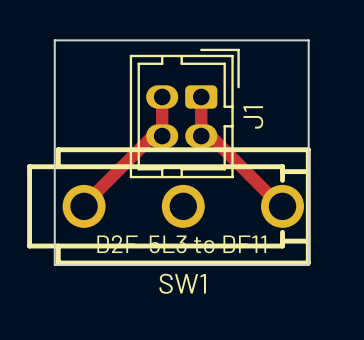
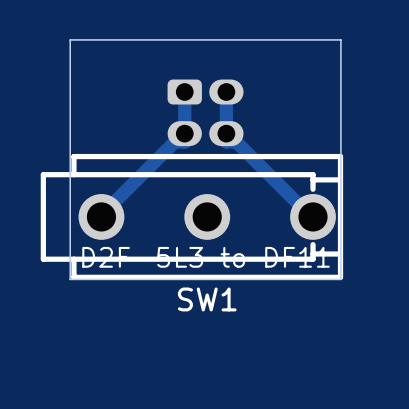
J1 side: top (184, 113) -> bottom (205, 112)

